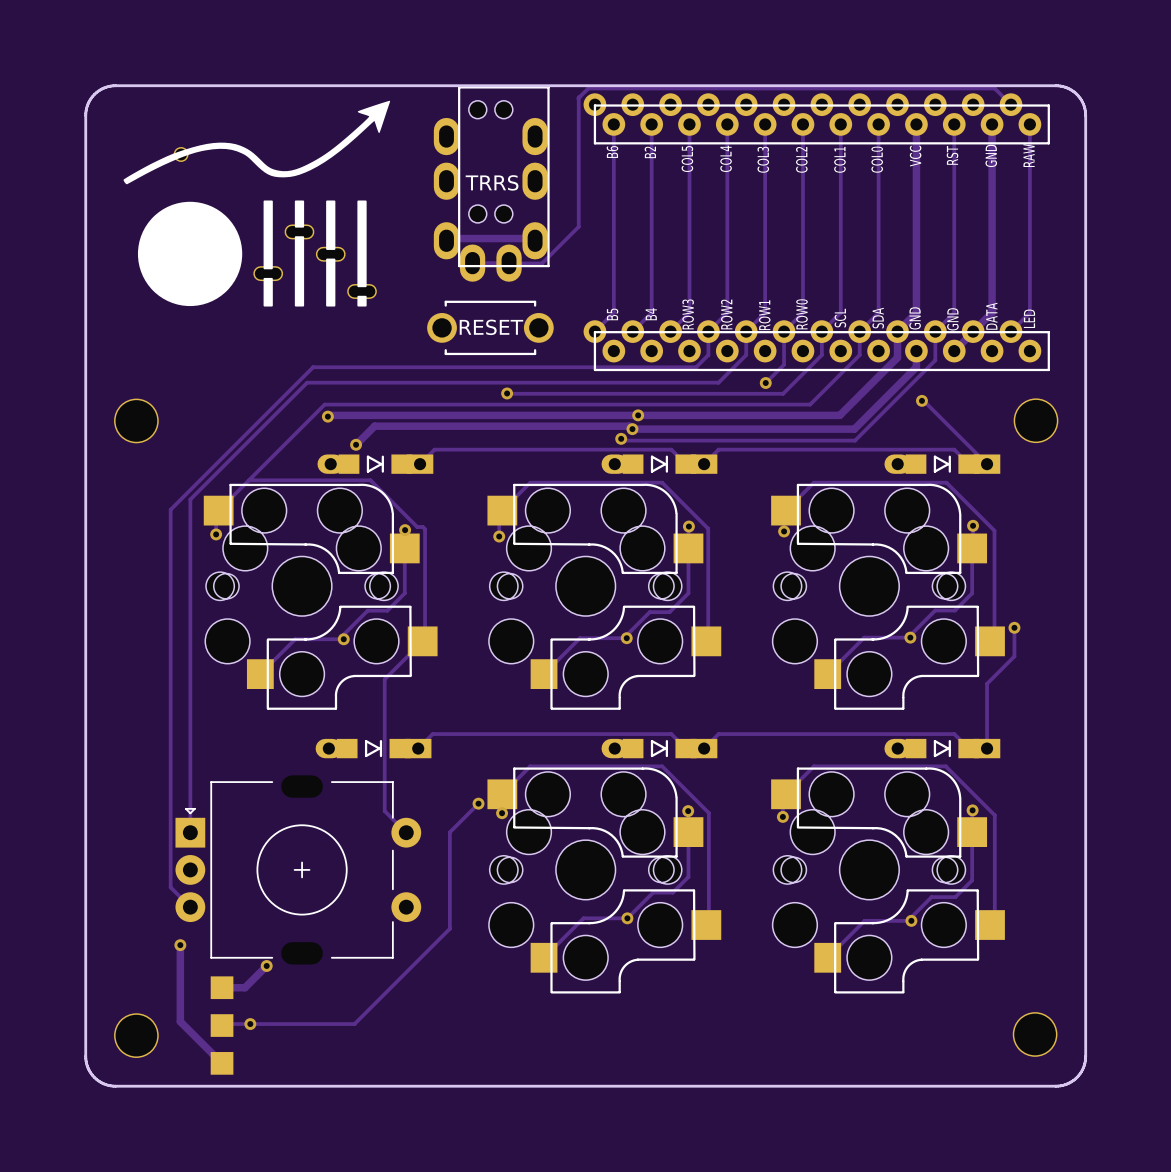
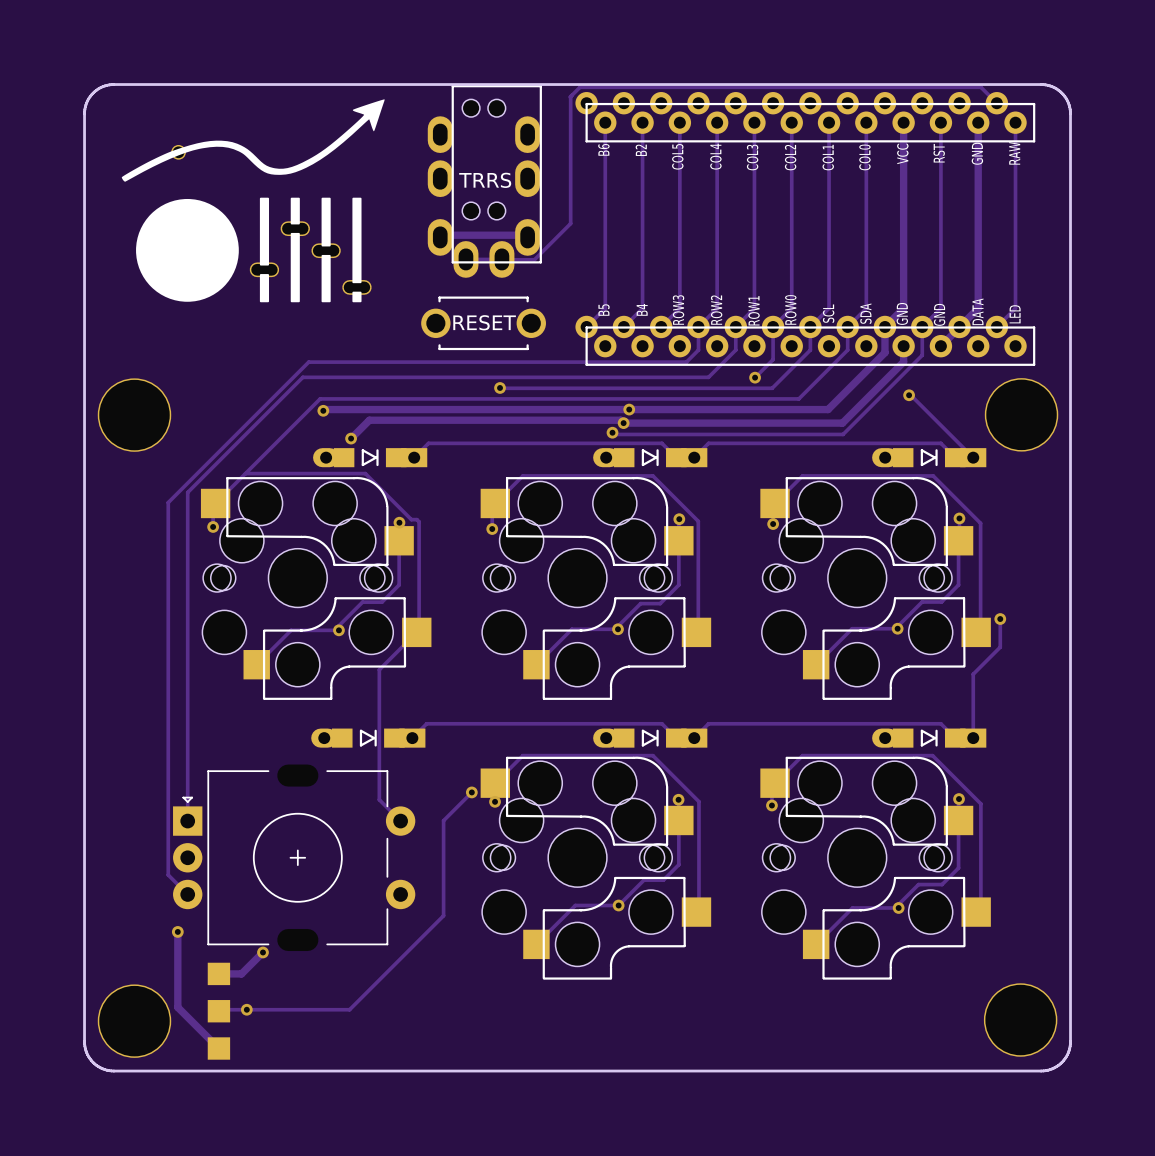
part footprint: [114, 398, 159, 444] -> [97, 378, 172, 452]
part footprint: [1013, 398, 1059, 444] -> [984, 378, 1059, 452]
part footprint: [1012, 1012, 1058, 1057] -> [983, 983, 1058, 1057]
part footprint: [114, 1013, 159, 1058] -> [97, 984, 172, 1058]

